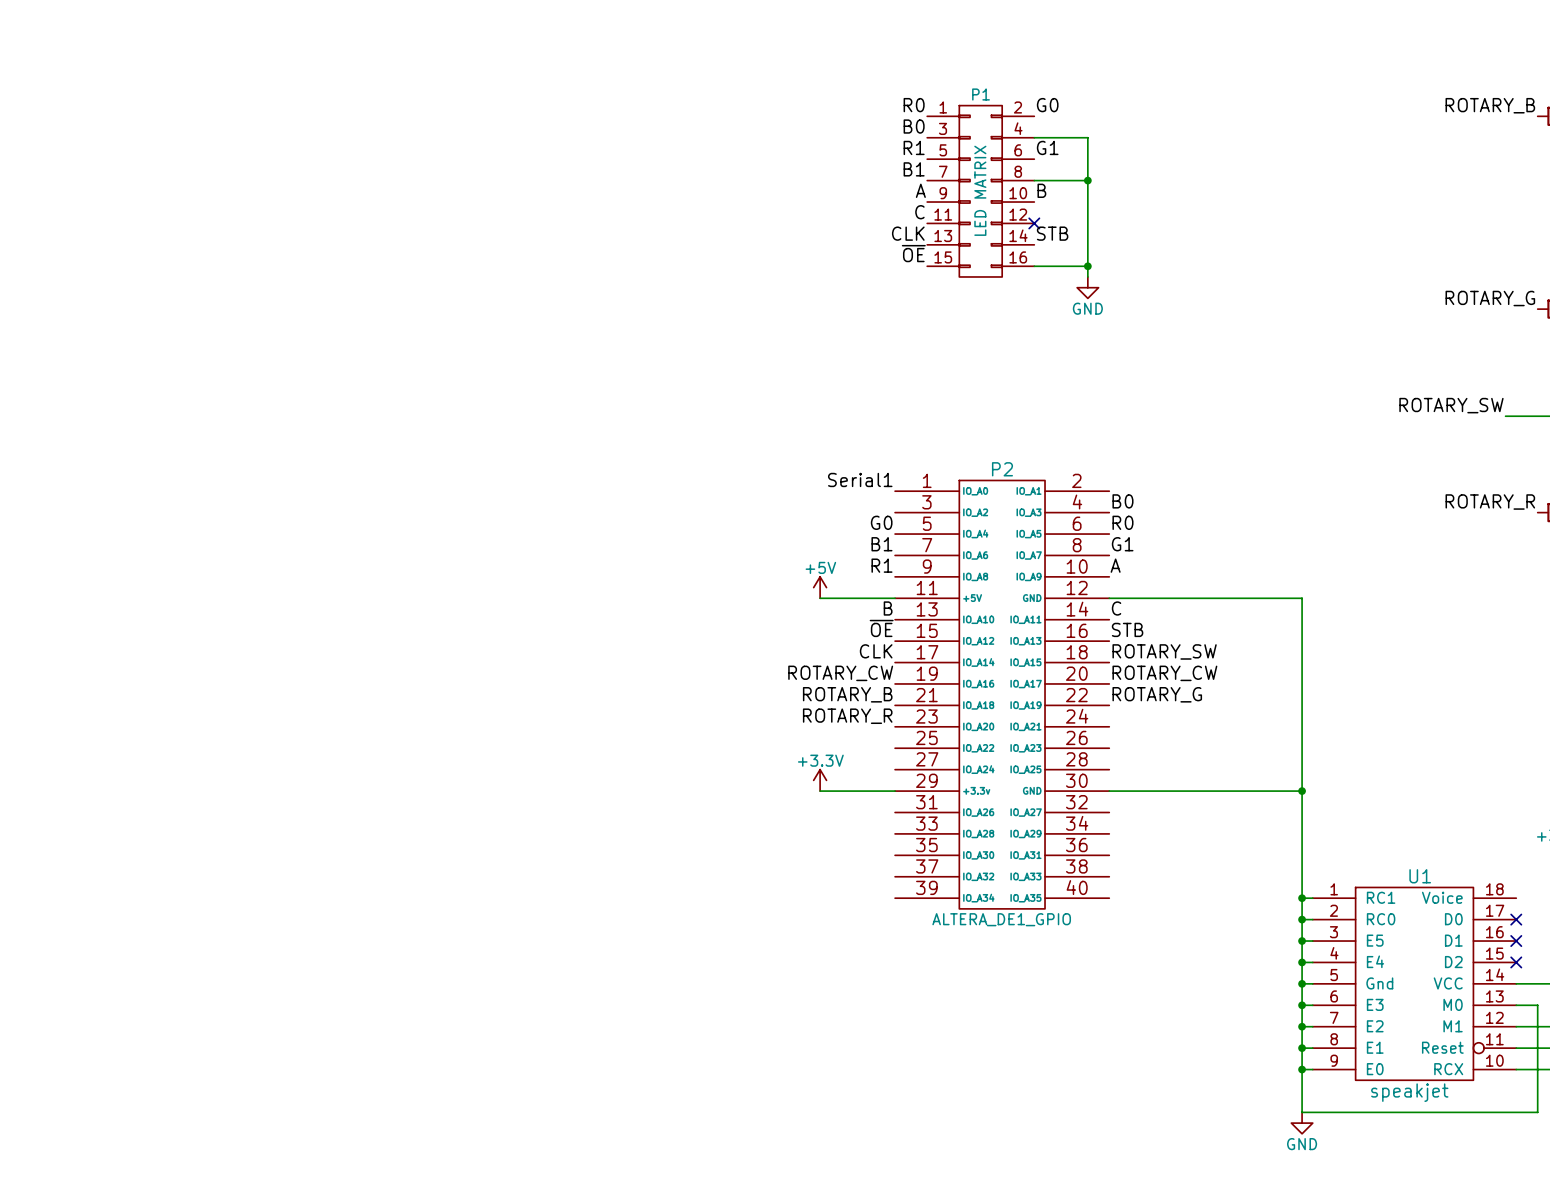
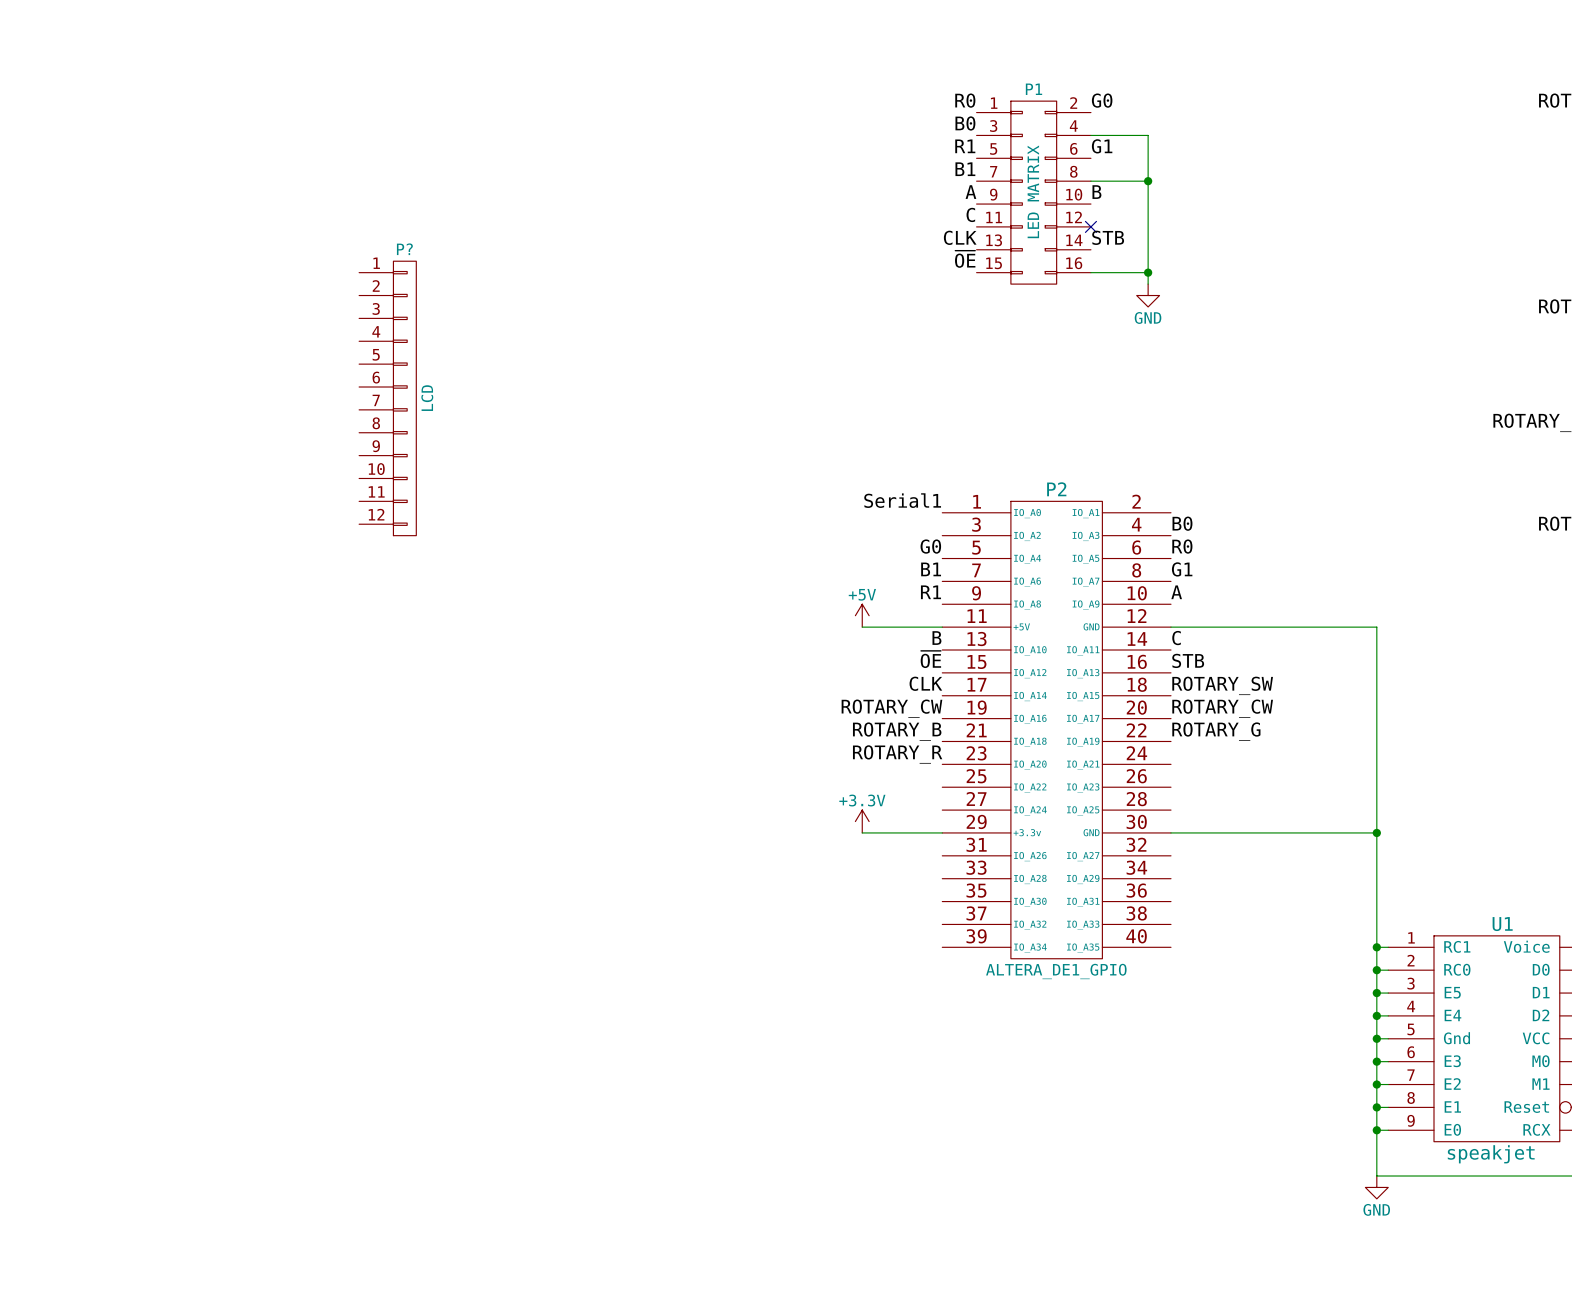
P?: none -> LCD (387, 398)

